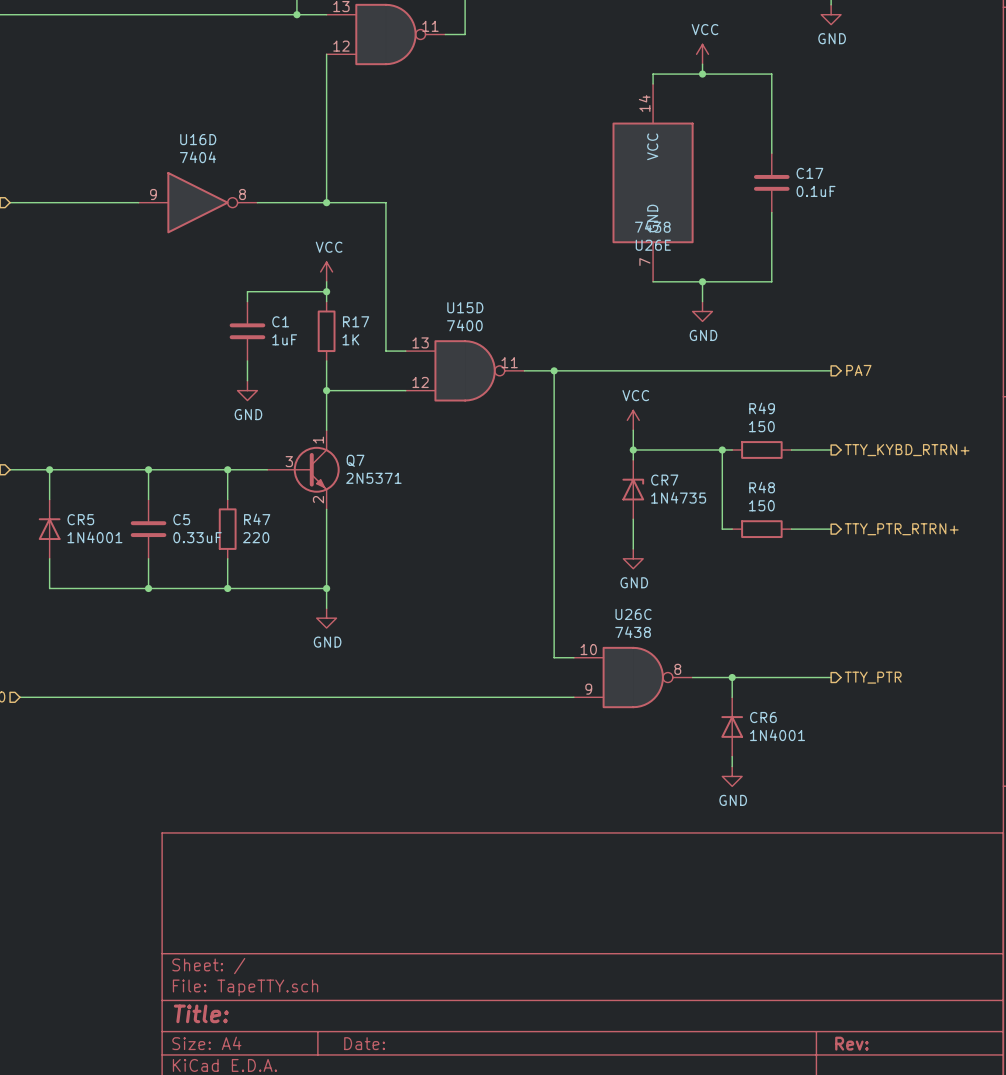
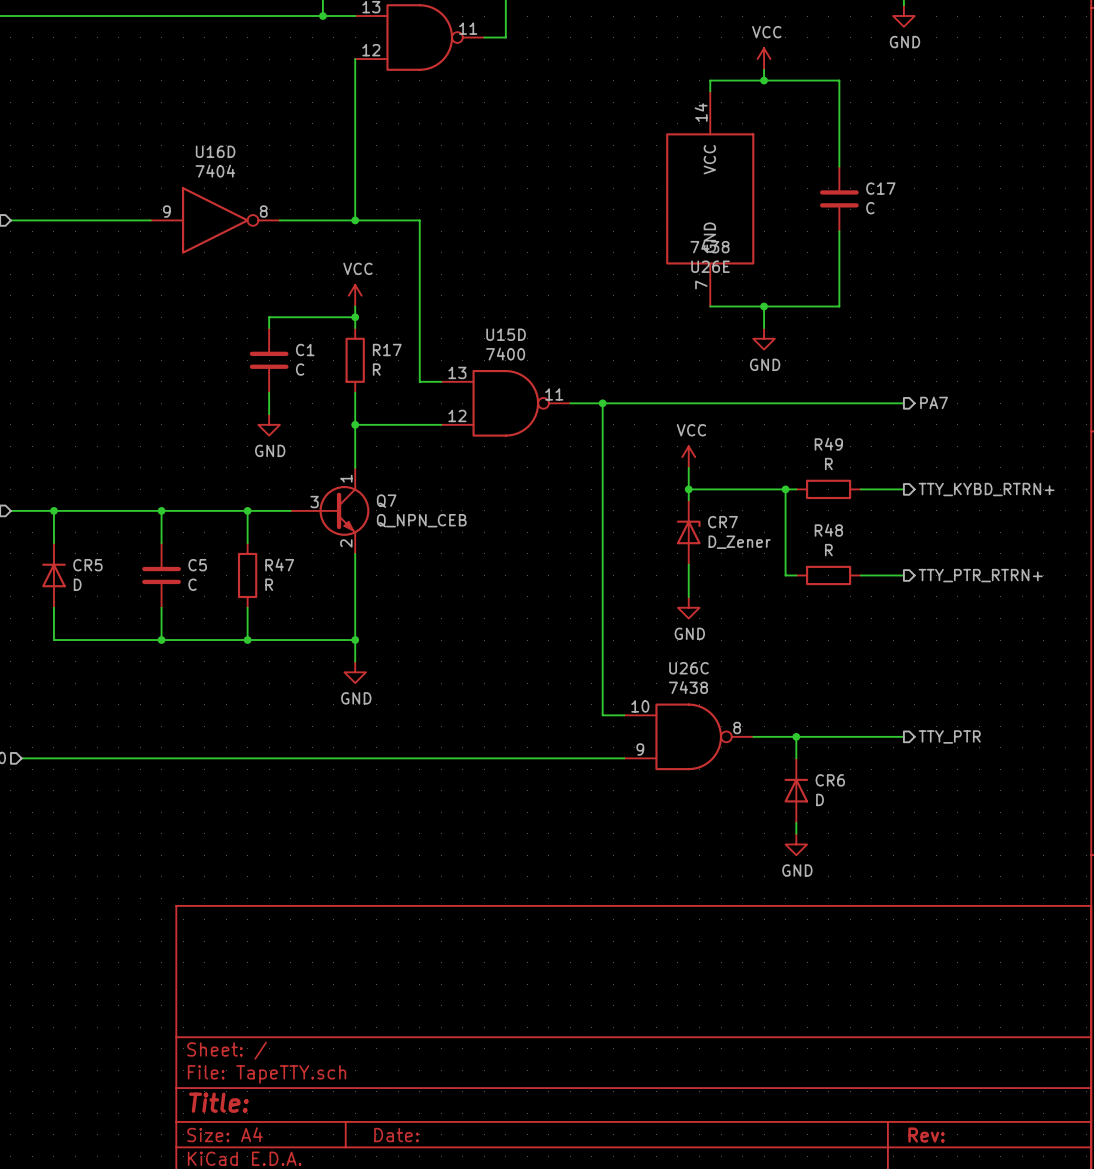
C17 value: 0.1uF (816, 191) -> C (870, 208)
C1 value: 1uF (284, 339) -> C (300, 369)
R17 value: 1K (350, 339) -> R (376, 369)
R49 value: 150 (761, 426) -> R (828, 464)
Q7 value: 2N5371 (373, 478) -> Q_NPN_CEB (421, 520)
CR7 value: 1N4735 (678, 497) -> D_Zener (739, 542)
R48 value: 150 (761, 505) -> R (828, 550)
CR5 value: 1N4001 (94, 537) -> D (77, 584)
C5 value: 0.33uF (197, 537) -> C (192, 584)
R47 value: 220 (256, 537) -> R (269, 584)
CR6 value: 1N4001 (777, 735) -> D (820, 799)

